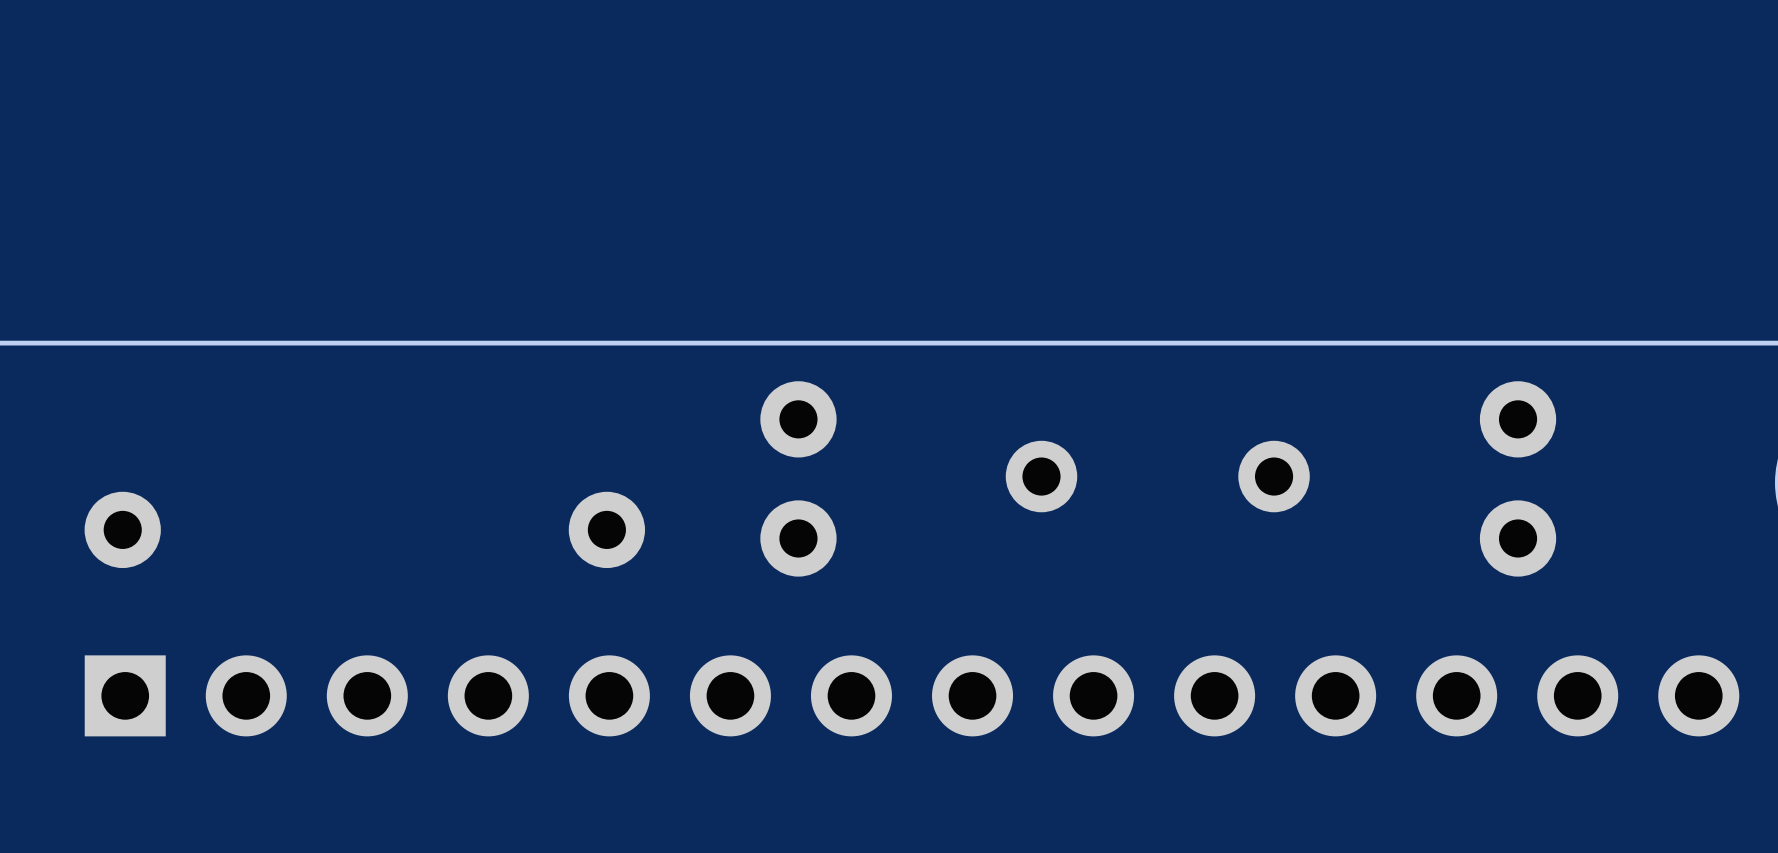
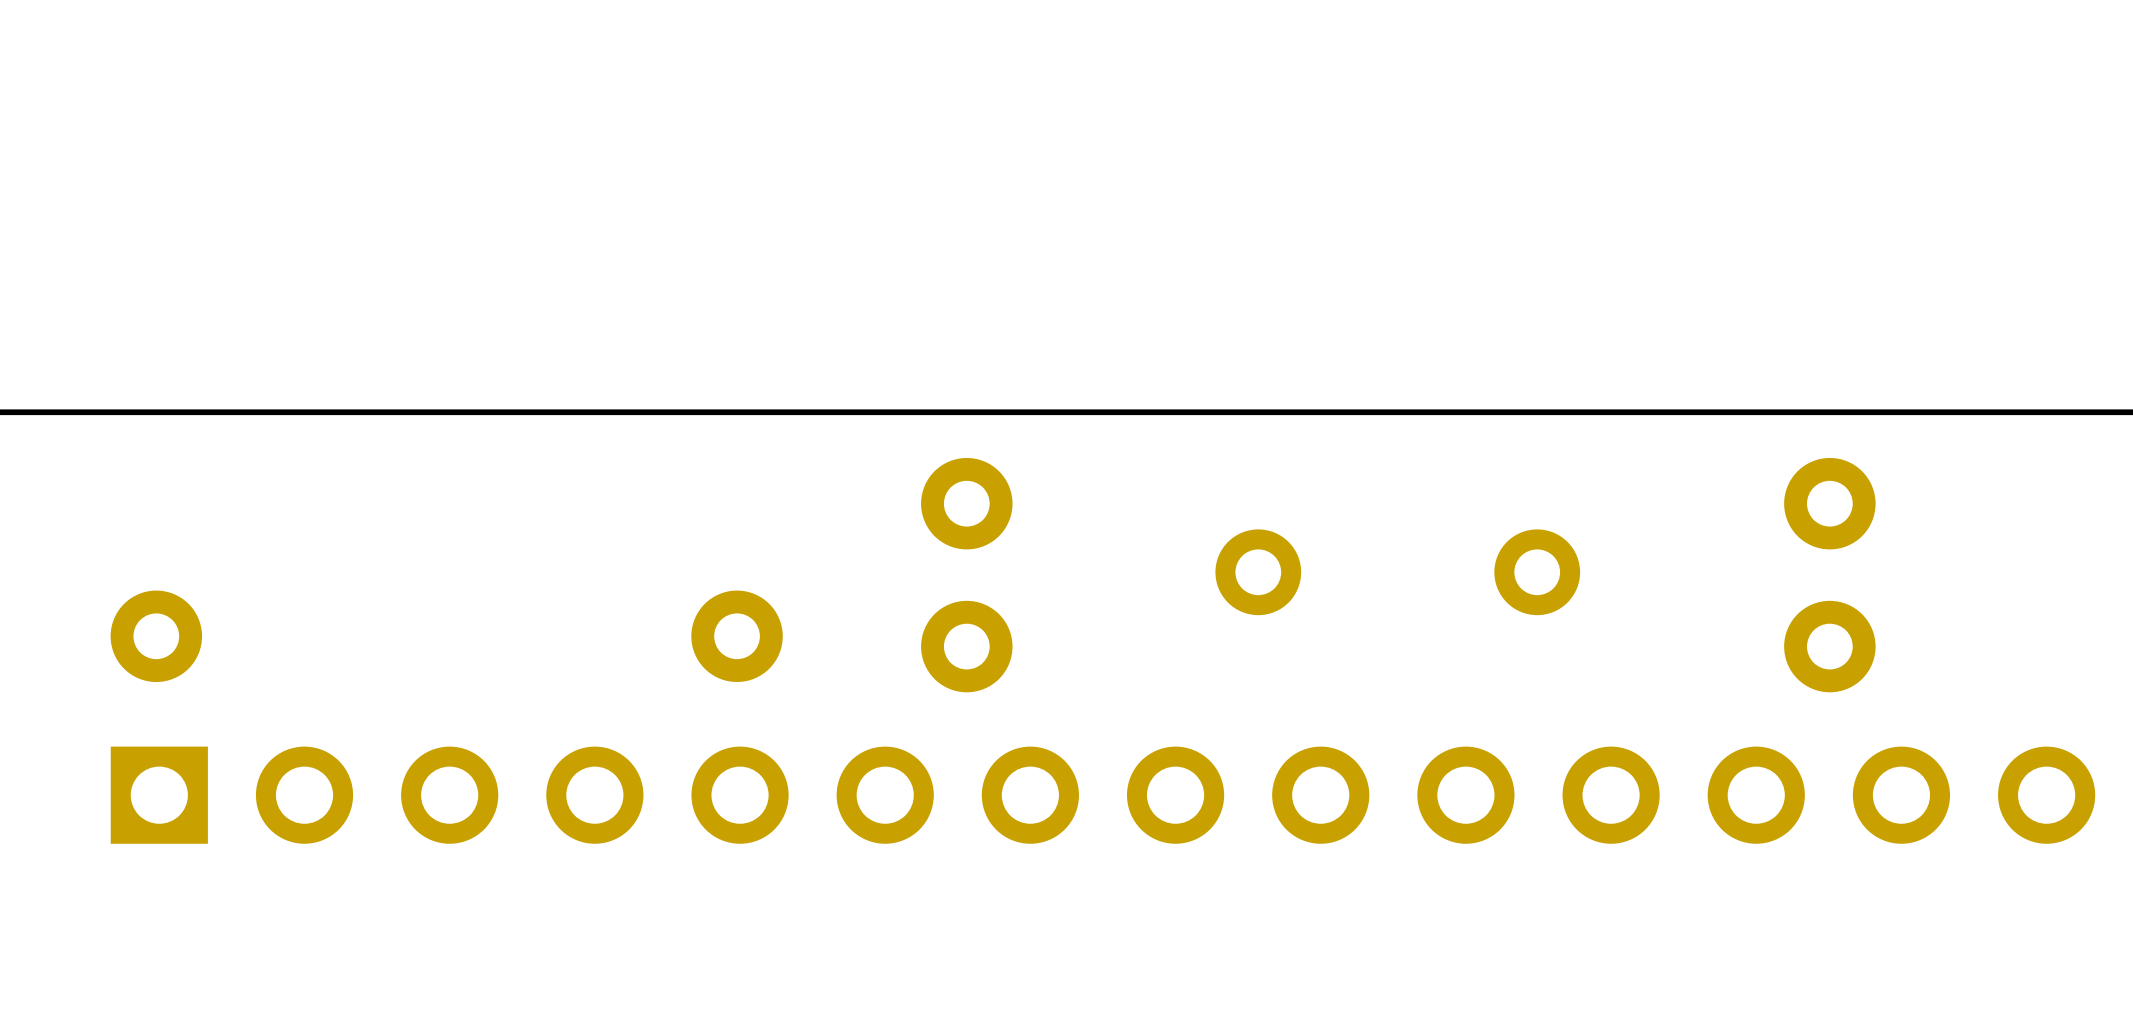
part position: (912, 695) -> (1102, 795)

